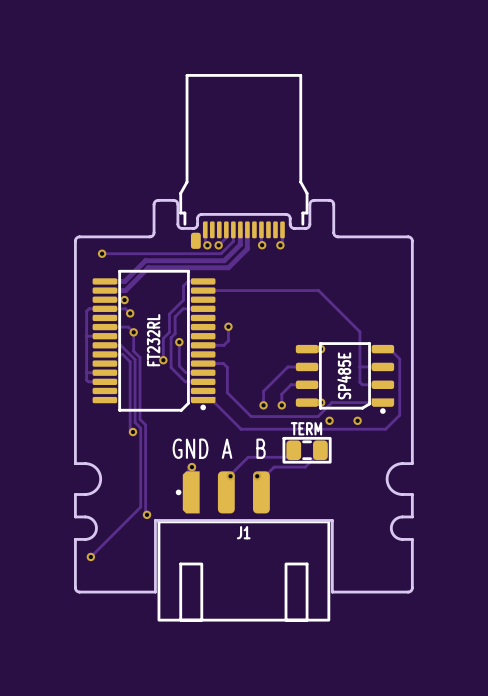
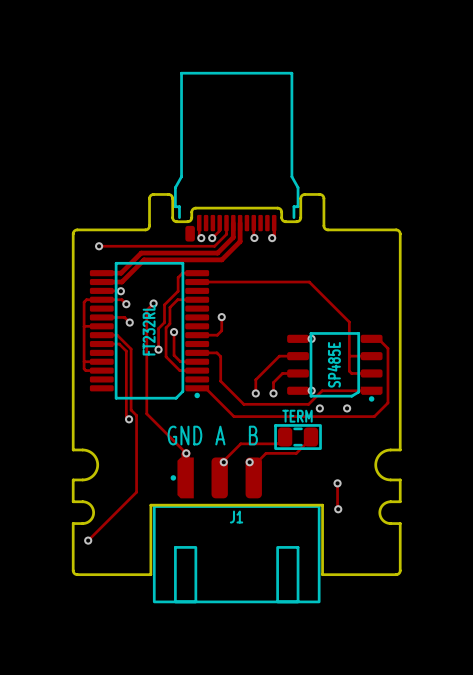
track: none -> (153, 303) (146, 310) (146, 413) (186, 453)
via: none -> (153, 303)
track: (133, 332) (133, 351) (140, 357) (140, 419) (145, 425) (147, 514) -> none
track: none -> (337, 483) (338, 509)
via: none -> (337, 483)
via: (147, 514) -> none
via: none -> (338, 509)

